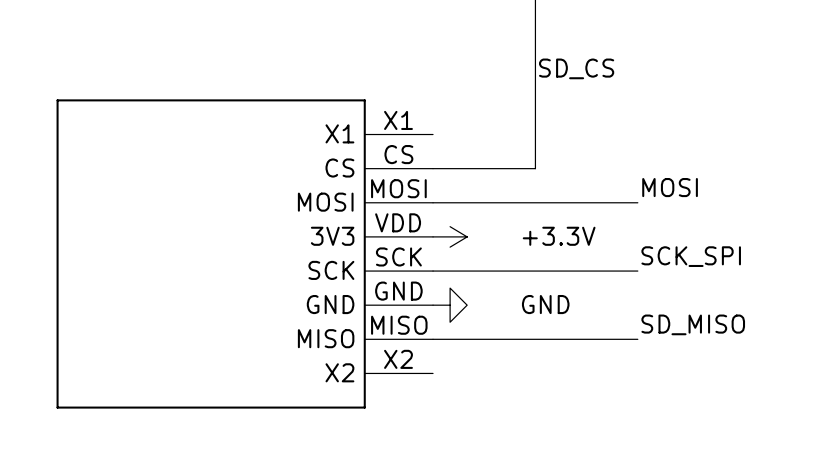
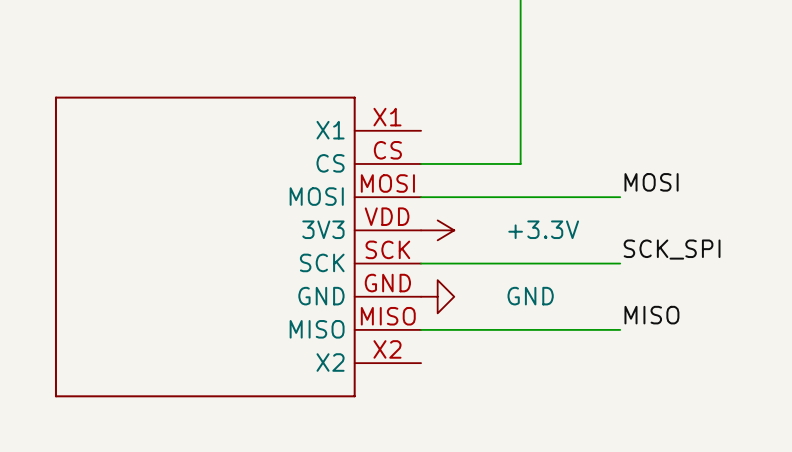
label: SD_CS (576, 68) -> none
label: SD_MISO (693, 324) -> MISO (651, 315)

